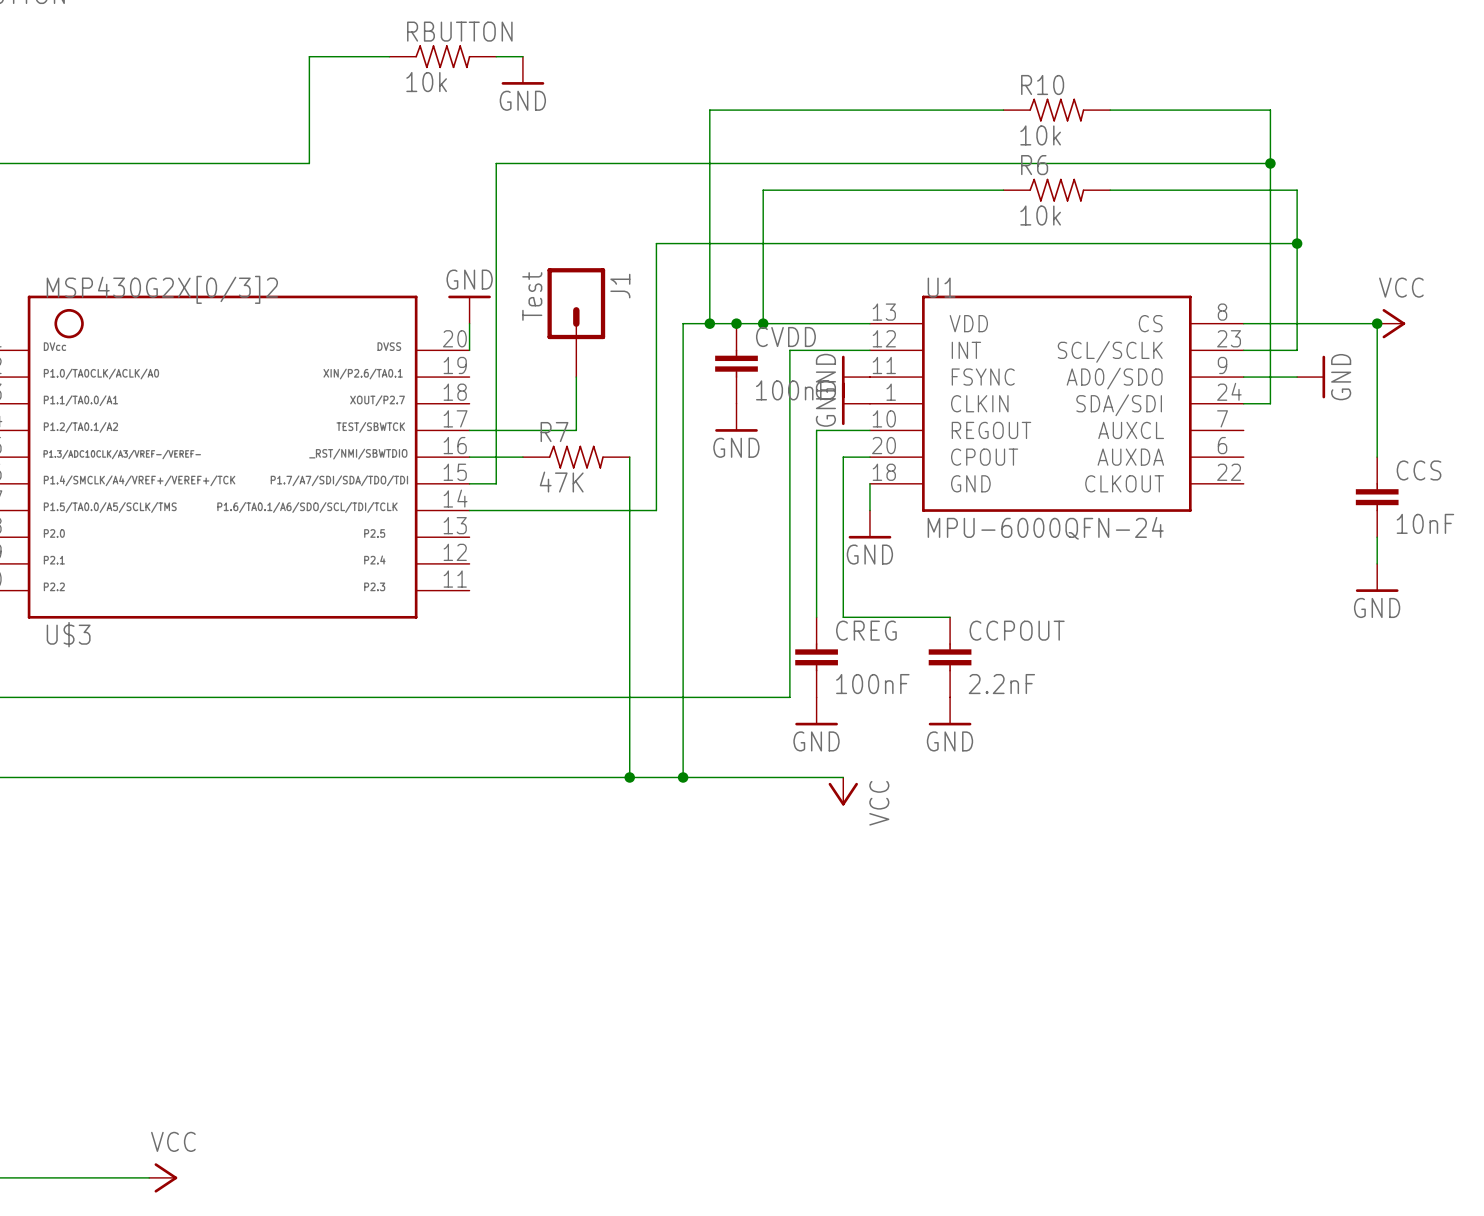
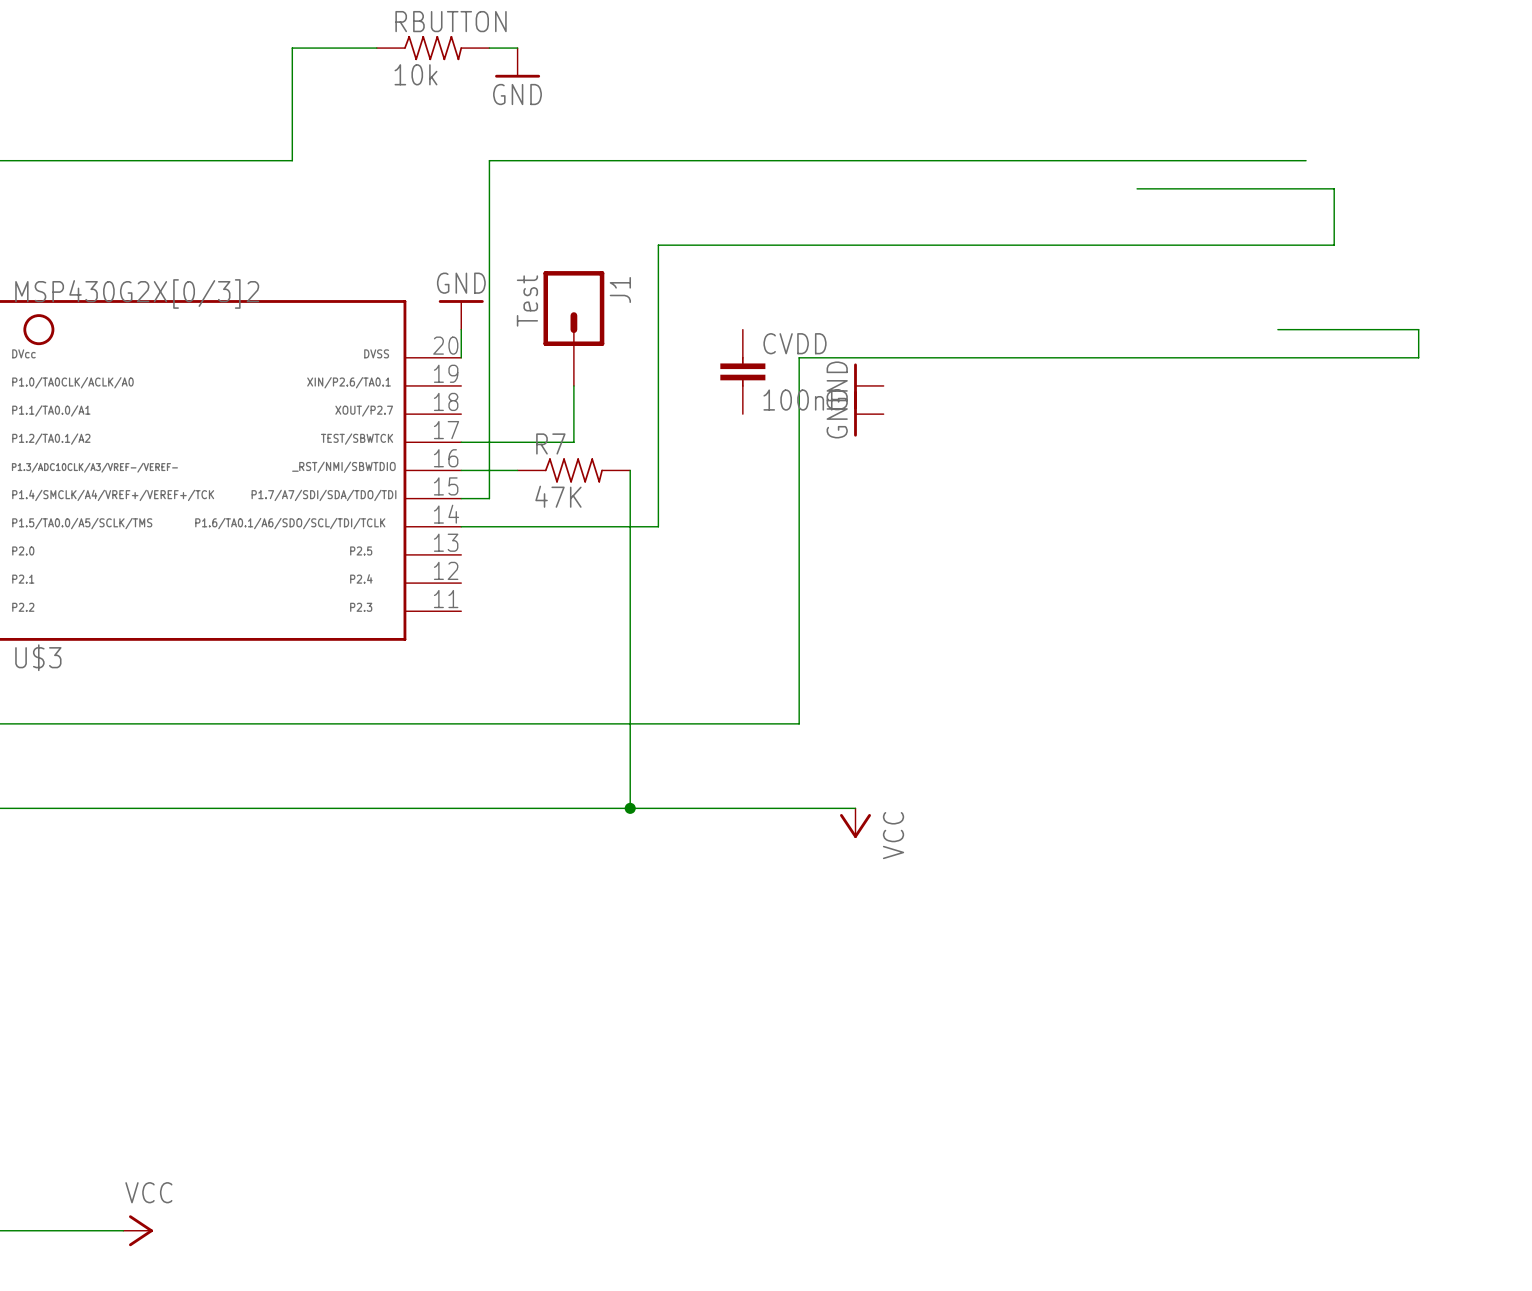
wire: (1003, 110) (709, 110) (709, 323) -> none
R10: 10k (1056, 110) -> none
wire: (1110, 110) (1270, 110) (1270, 403) (1243, 403) -> none
junction: (1270, 163) -> none
wire: (1003, 190) (763, 190) (763, 323) -> none
R6: 10k (1056, 190) -> none
wire: (1297, 243) (1297, 350) -> (1418, 357) (1334, 357)
junction: (1297, 243) -> none
junction: (709, 323) -> none
junction: (736, 323) -> none
junction: (763, 323) -> none
wire: (869, 323) (683, 323) (683, 777) -> none
junction: (1377, 323) -> none
power symbol: VCC (1391, 323) -> none
wire: none -> (883, 357) (1277, 357)
wire: (1377, 350) (1377, 457) -> none
wire: (1243, 377) (1297, 377) -> none
power symbol: GND (1311, 377) -> none
U1: MPU-6000QFN-24 (1056, 403) -> none
power symbol: GND (736, 417) -> none
wire: (869, 430) (816, 430) (816, 617) -> none
wire: (869, 457) (843, 457) (843, 617) (950, 617) -> none
wire: (869, 483) (869, 510) -> none
CCS: 10nF (1377, 497) -> none
power symbol: GND (869, 524) -> none
wire: (1377, 537) (1377, 563) -> none
power symbol: GND (1377, 577) -> none
CREG: 100nF (816, 657) -> none
CCPOUT: 2.2nF (950, 657) -> none
power symbol: GND (816, 711) -> none
power symbol: GND (950, 711) -> none
junction: (683, 777) -> none

